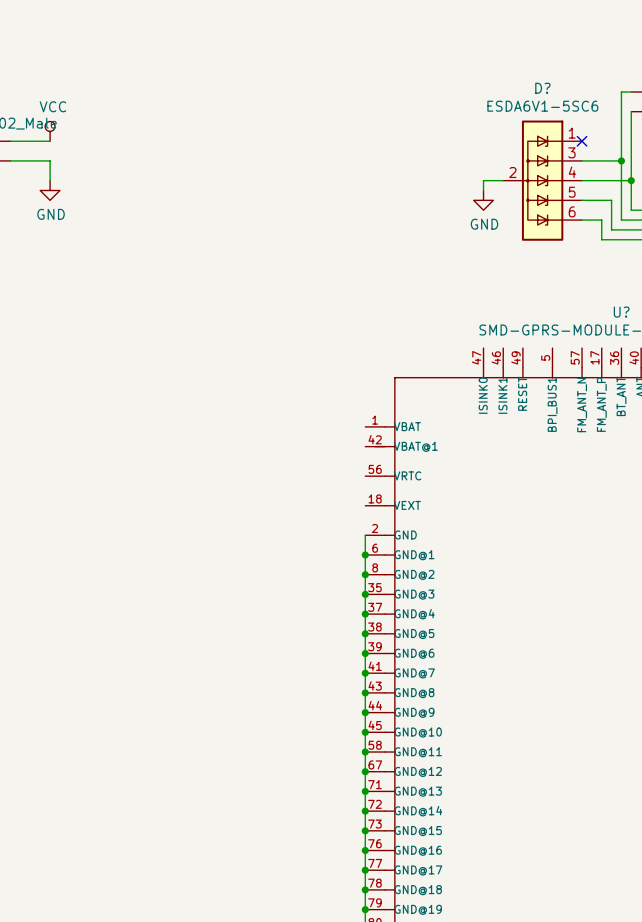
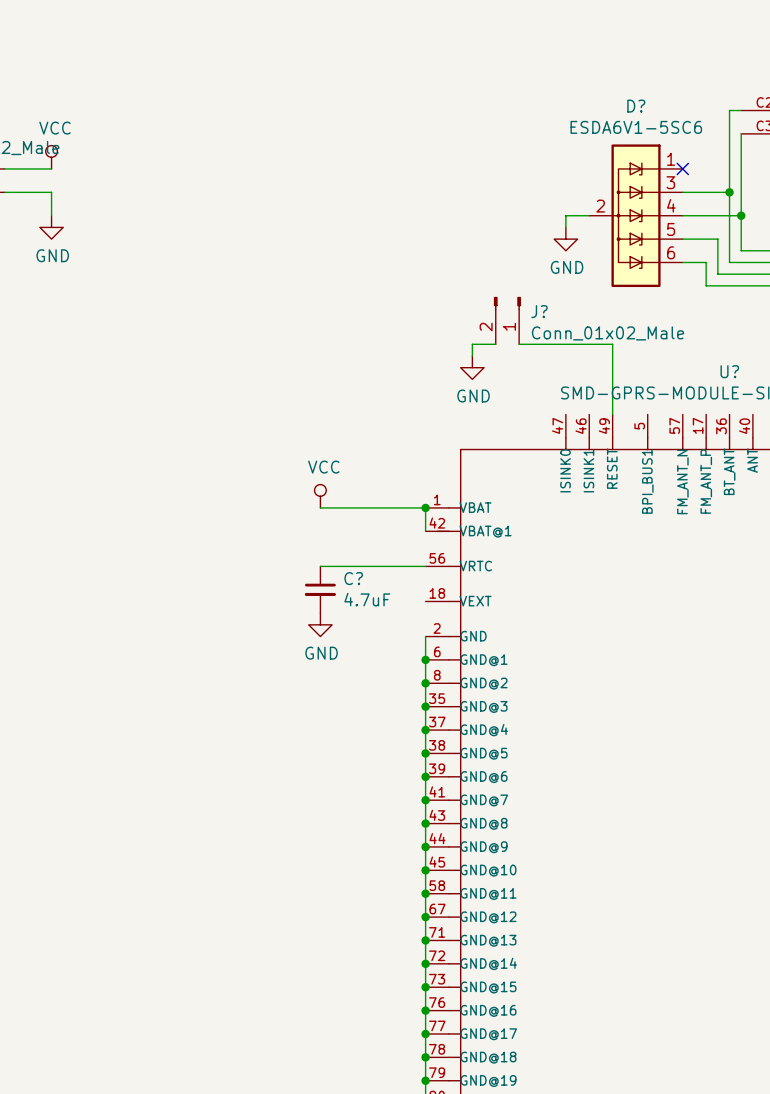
J?: none -> Conn_01x02_Male (507, 320)
wire: none -> (495, 344) (472, 344) (472, 356)
wire: none -> (519, 344) (612, 344) (612, 414)
power symbol: none -> GND (472, 367)
power symbol: none -> VCC (320, 496)
wire: none -> (320, 507) (425, 507) (425, 531)
junction: none -> (425, 507)
wire: none -> (320, 566) (425, 566)
C?: none -> 4.7uF (320, 589)
power symbol: none -> GND (320, 624)

